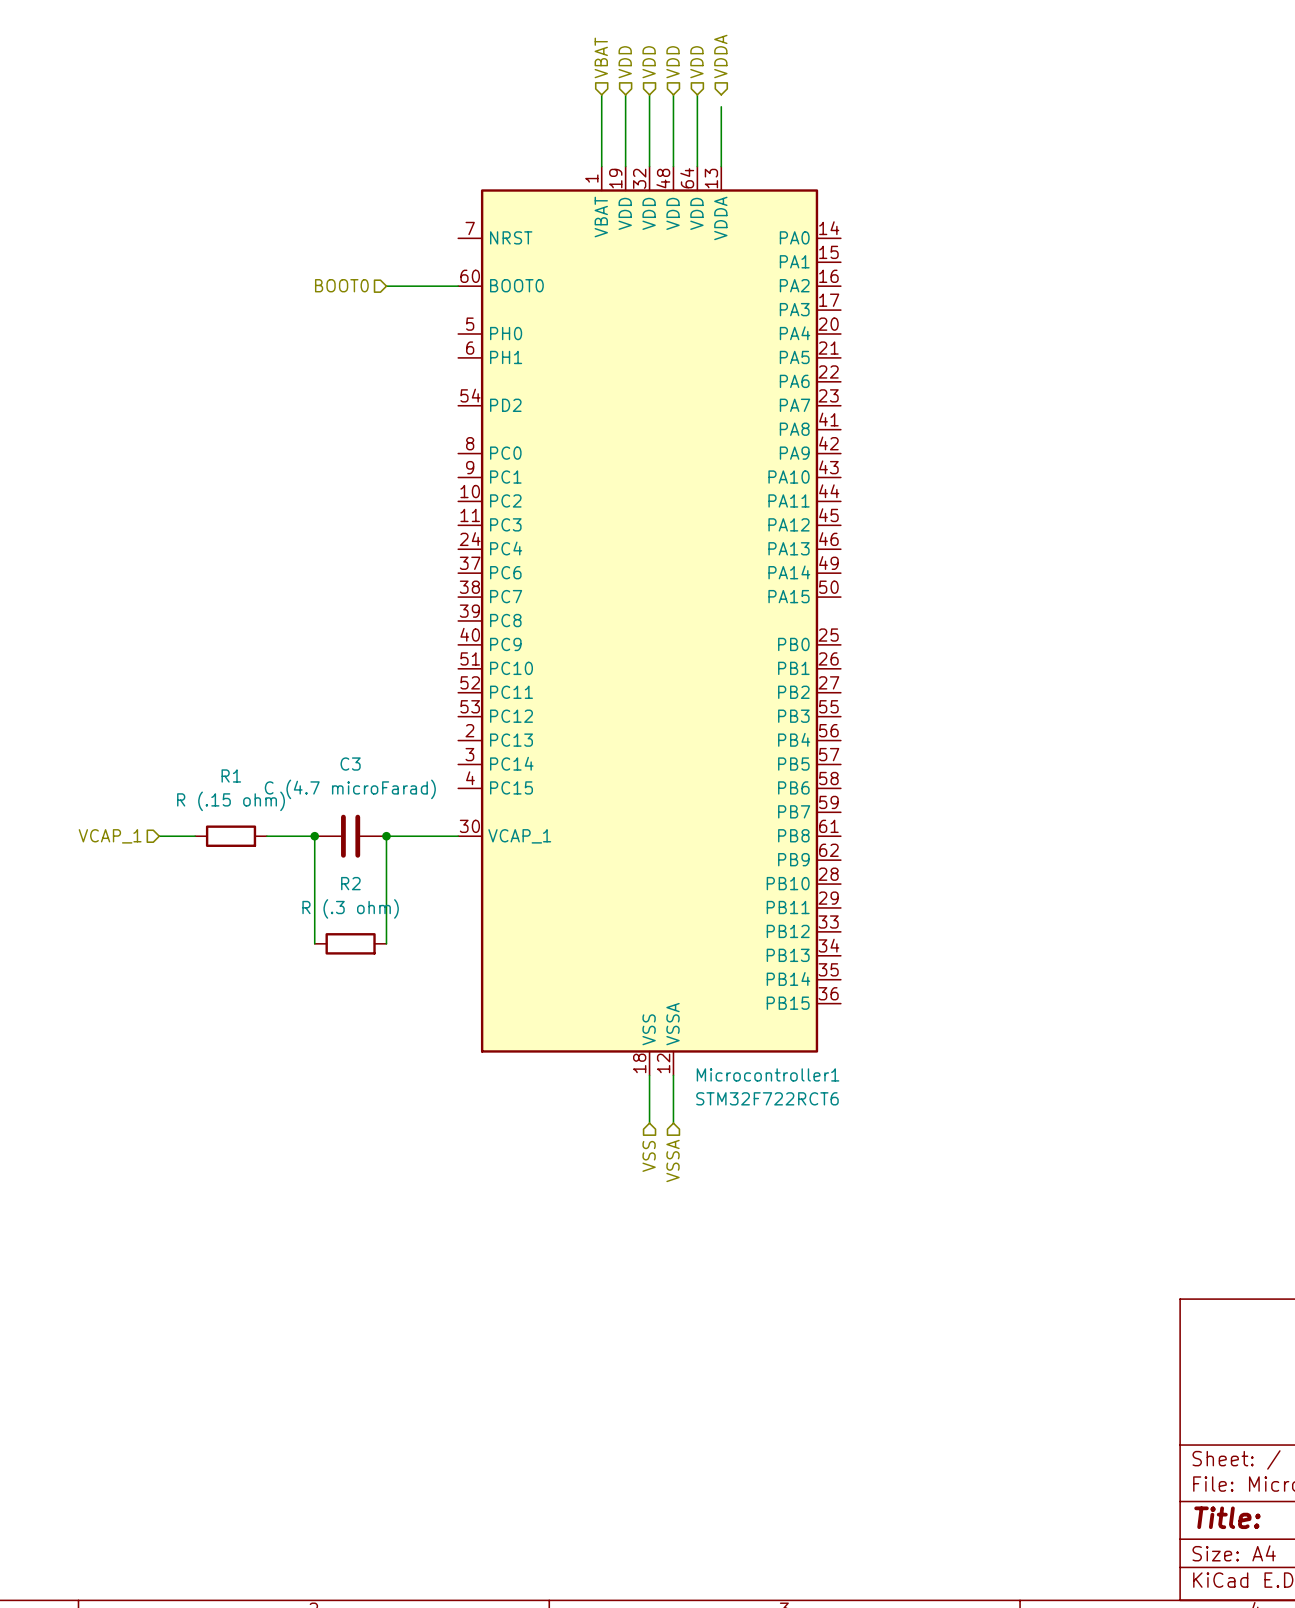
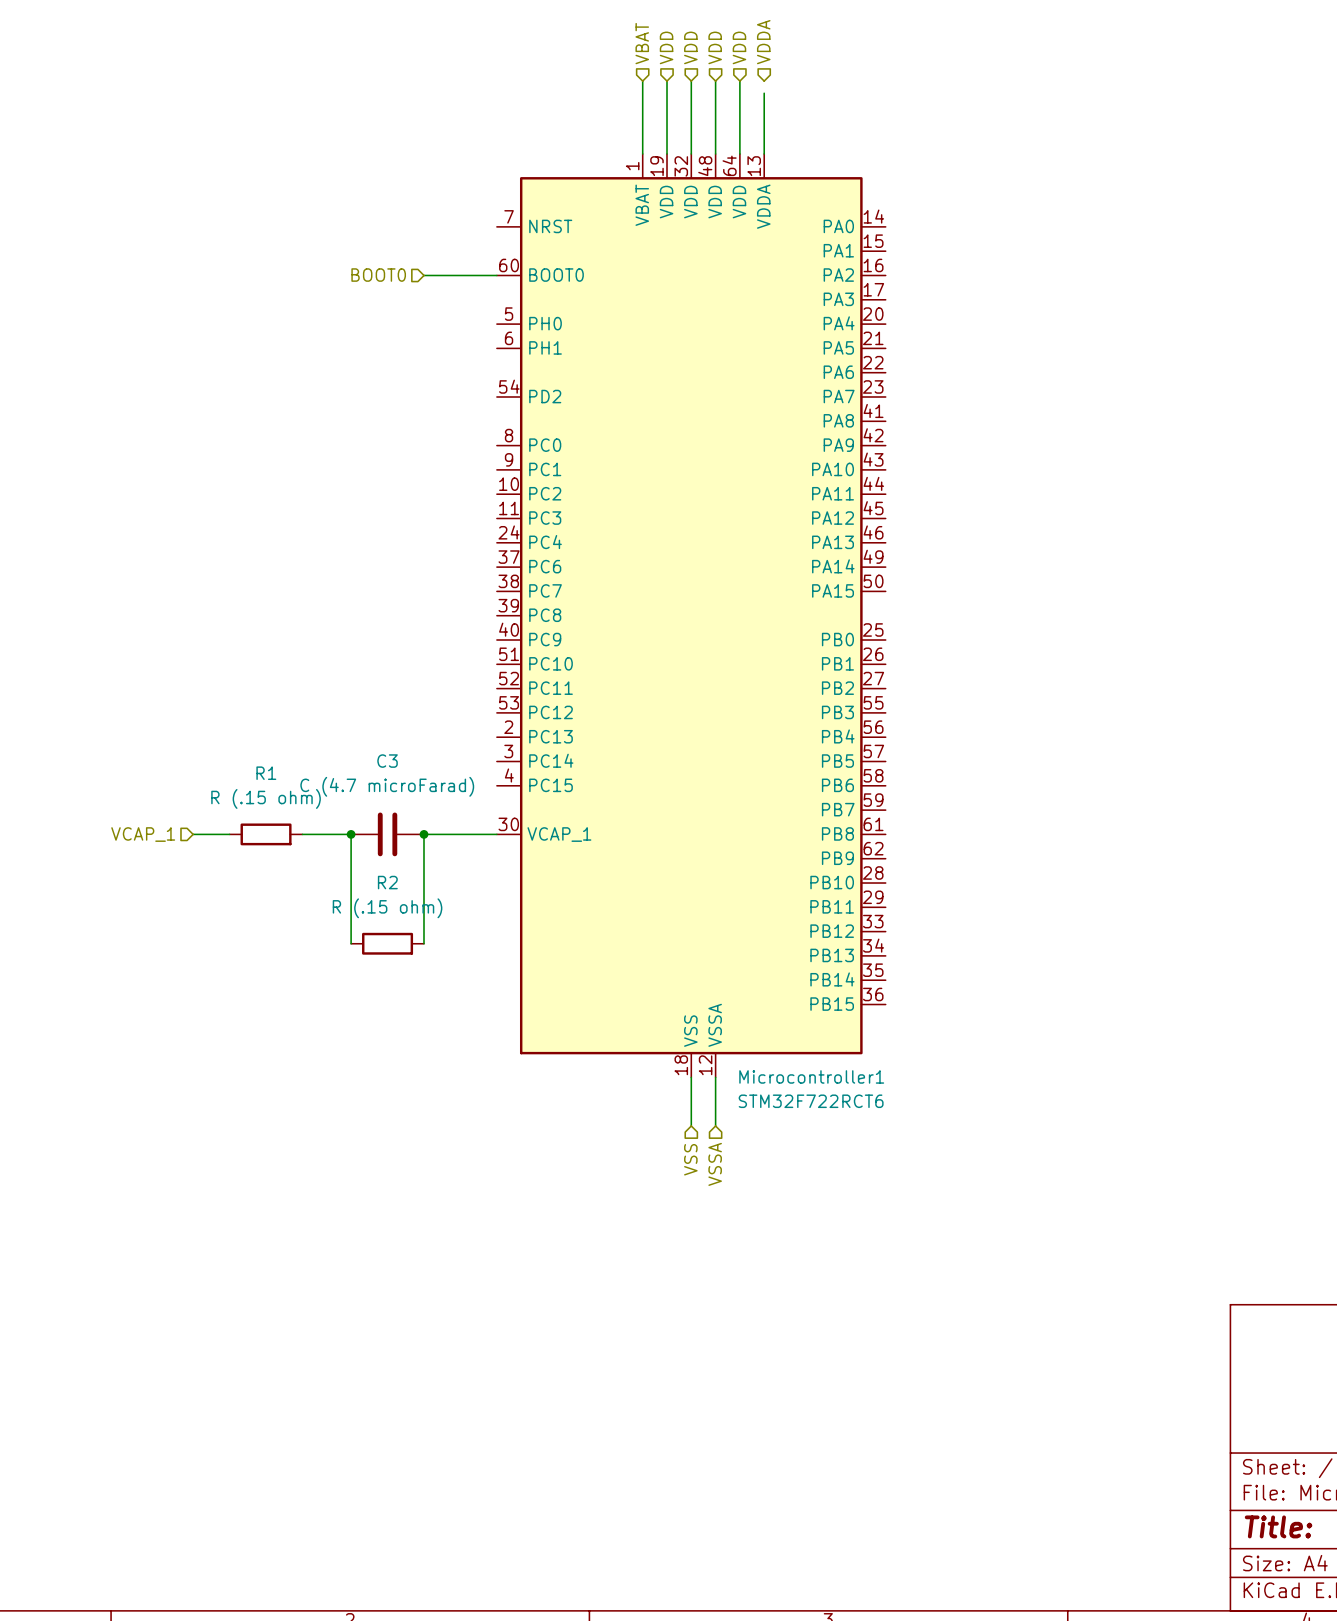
R2 value: R (.3 ohm) (350, 908) -> R (.15 ohm) (387, 908)

